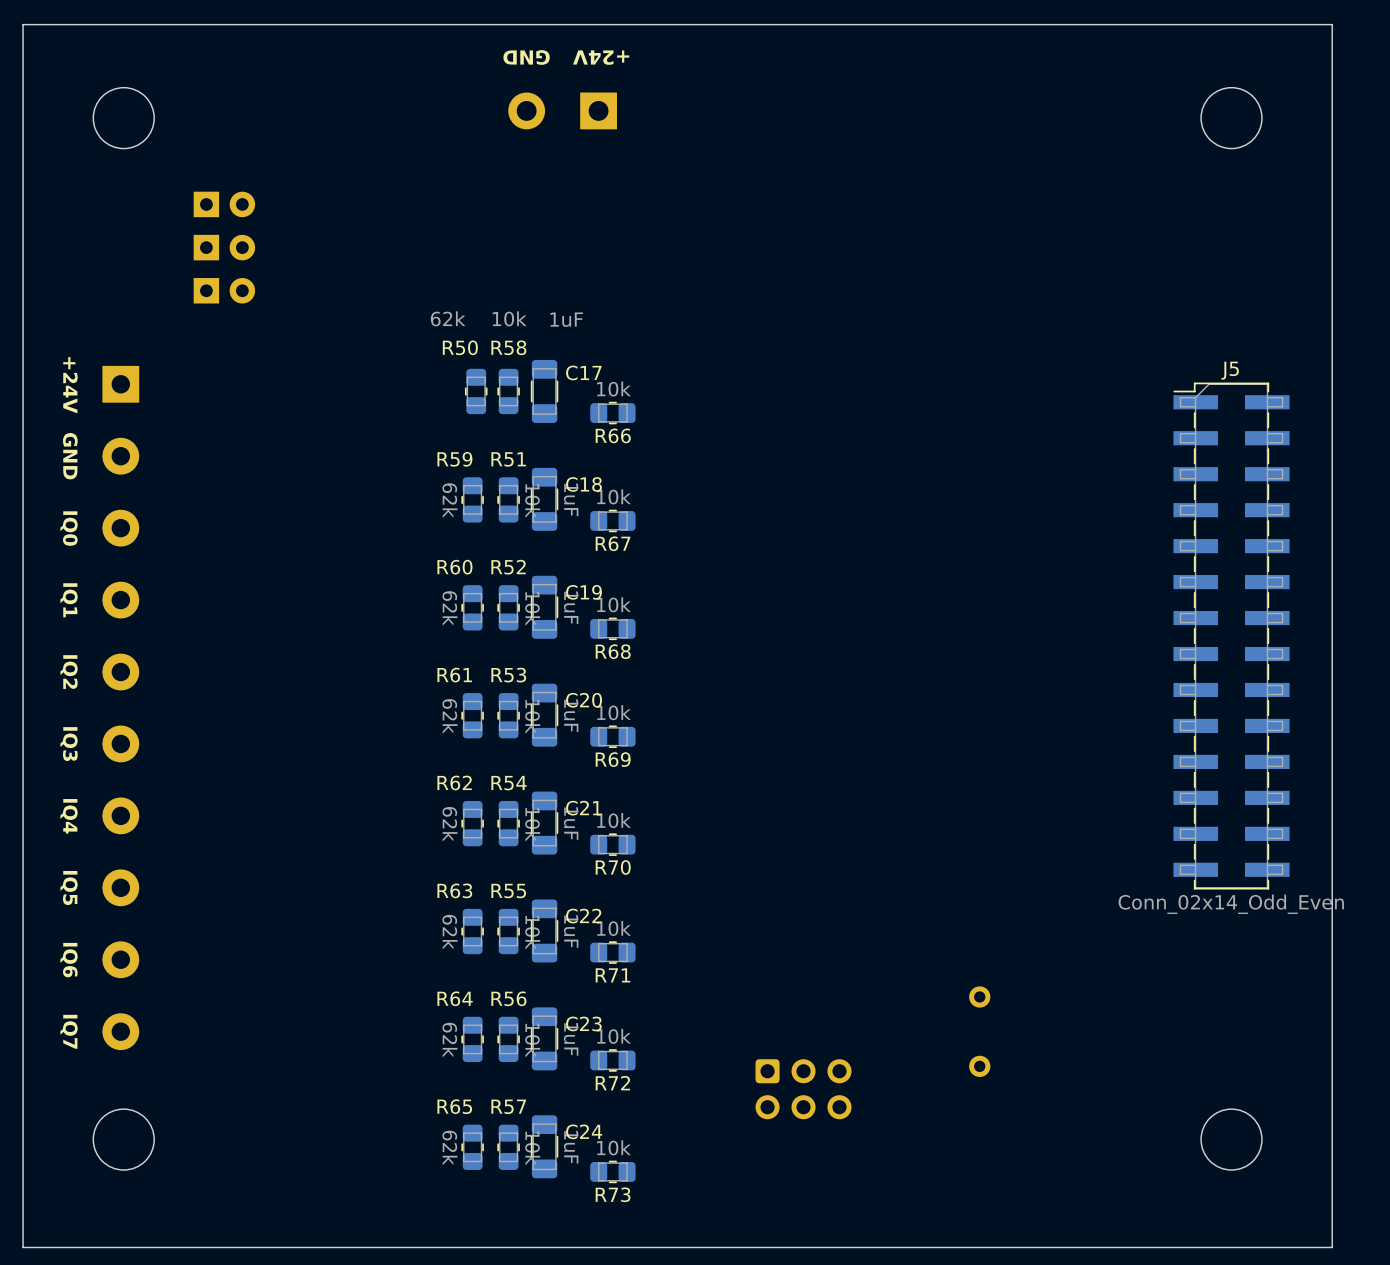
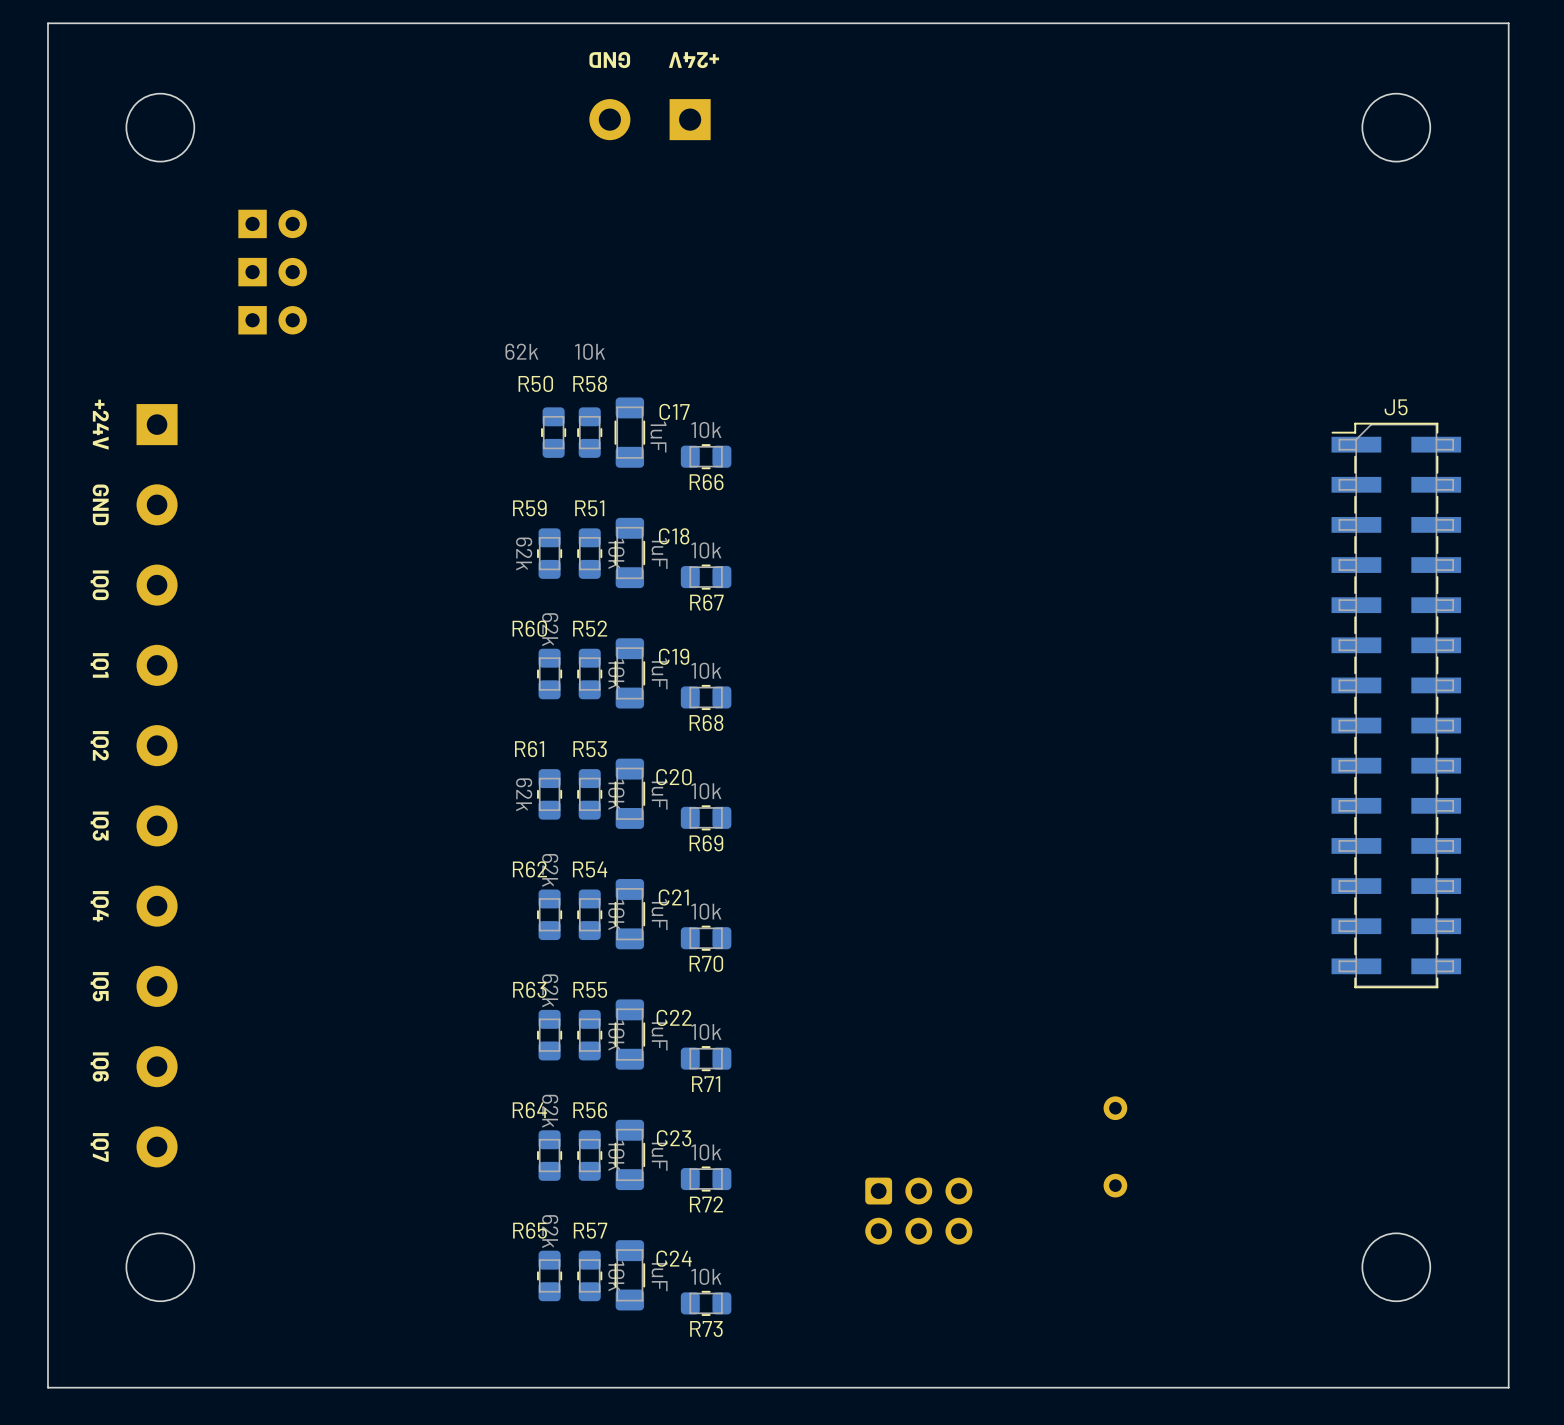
C17 value rotation: 0° (566, 319) -> 90° clockwise (658, 437)
C17 value position: 1uF (566, 319) -> 1uF (658, 437)
R52 value position: 62k (449, 608) -> 62k (550, 629)
R54 value position: 62k (449, 824) -> 62k (550, 870)
J5 value: Conn_02x14_Odd_Even (1231, 904) -> none
R55 value position: 62k (449, 932) -> 62k (550, 990)
R56 value position: 62k (449, 1040) -> 62k (550, 1111)
R57 value position: 62k (449, 1147) -> 62k (550, 1231)

